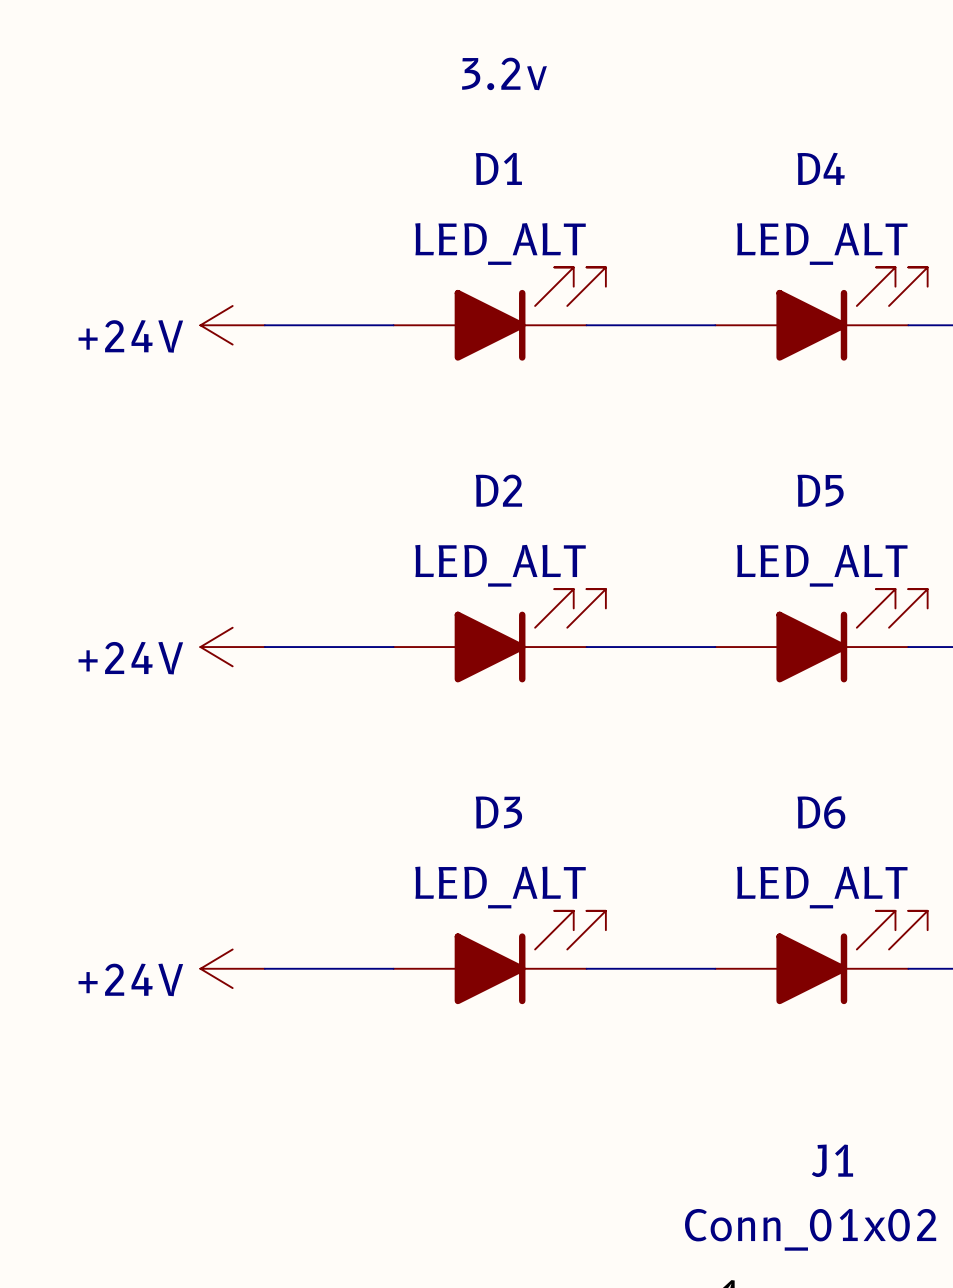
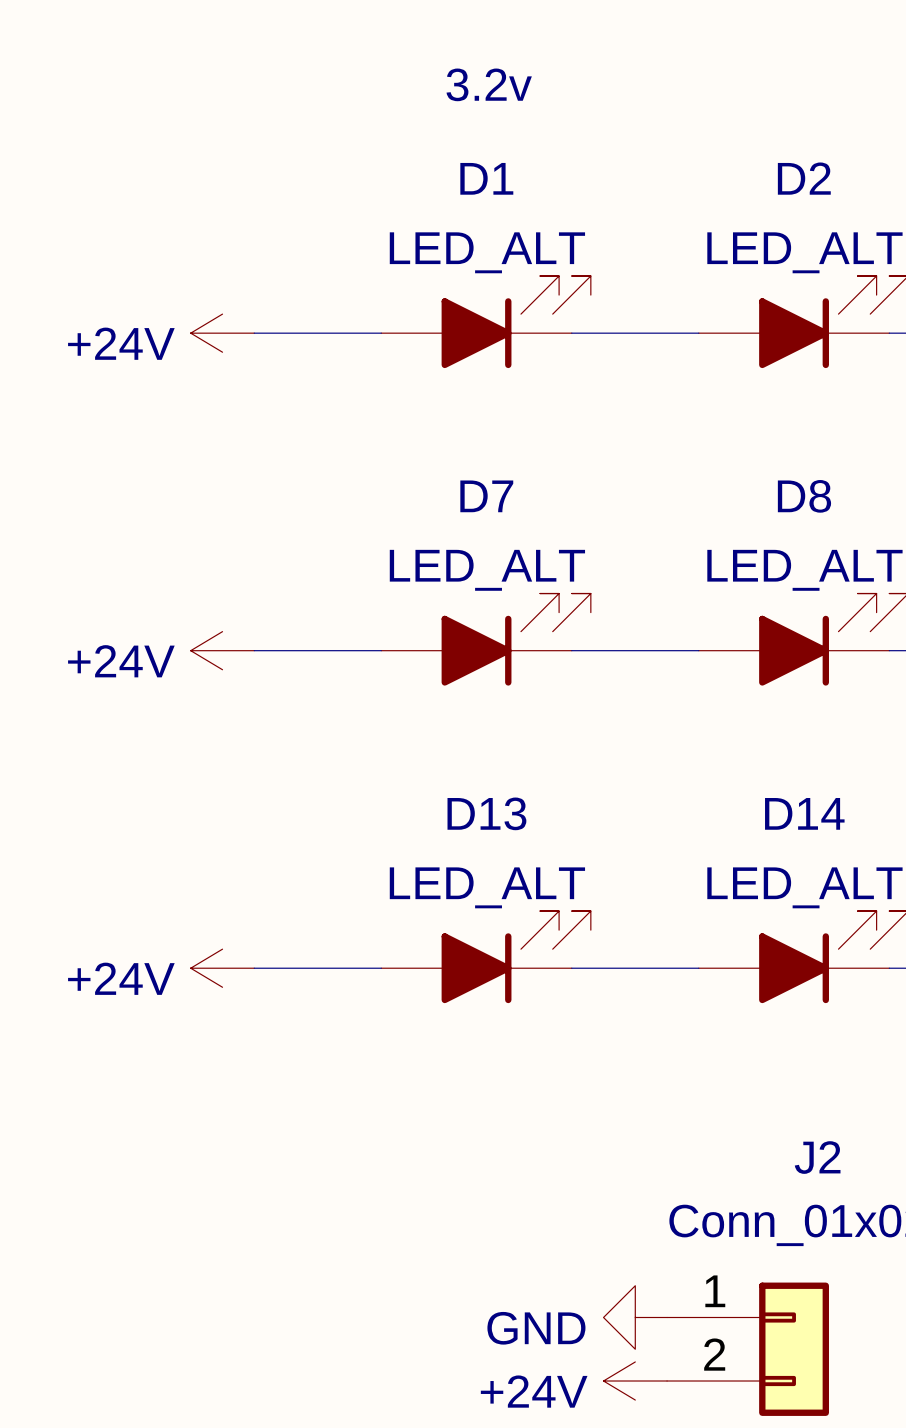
D4 name: D4 (821, 168) -> D2 (804, 178)
D2 name: D2 (498, 490) -> D7 (486, 496)
D5 name: D5 (820, 490) -> D8 (804, 496)
D3 name: D3 (498, 812) -> D13 (486, 813)
D6 name: D6 (821, 812) -> D14 (804, 813)
J1 name: J1 (832, 1160) -> J2 (817, 1157)

